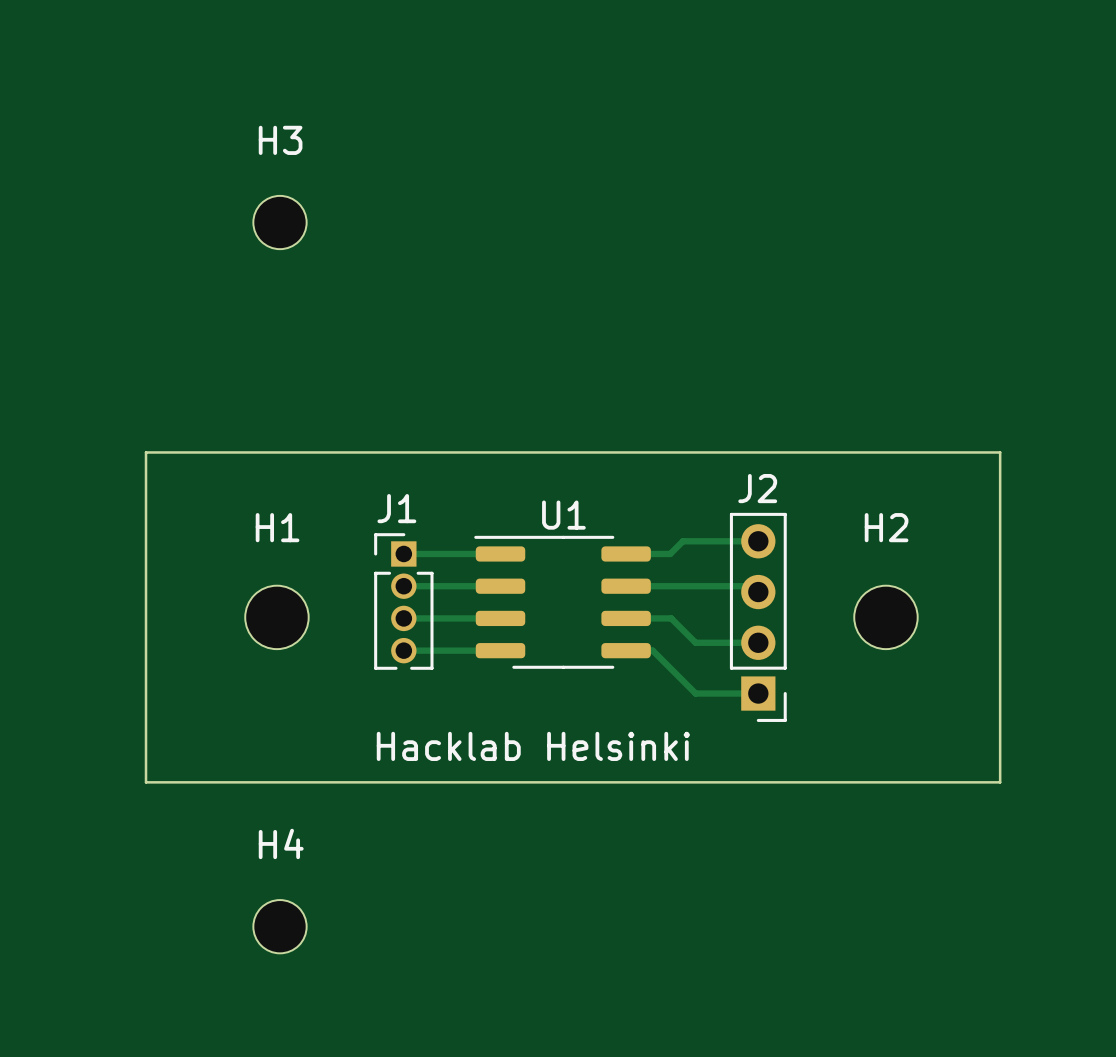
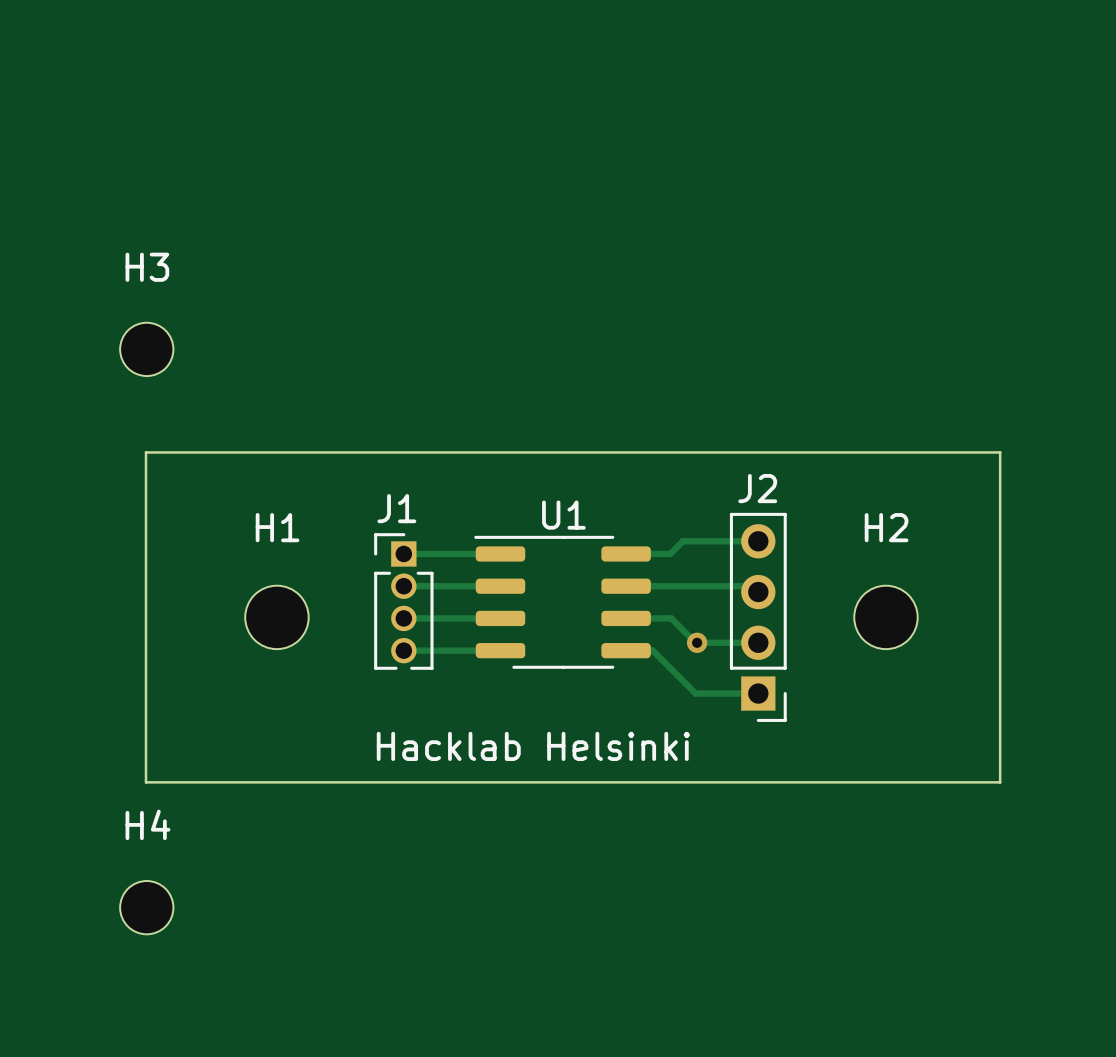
H3 position: (279, 222) -> (146, 349)
via: none -> (697, 642)
H4 position: (279, 926) -> (146, 907)

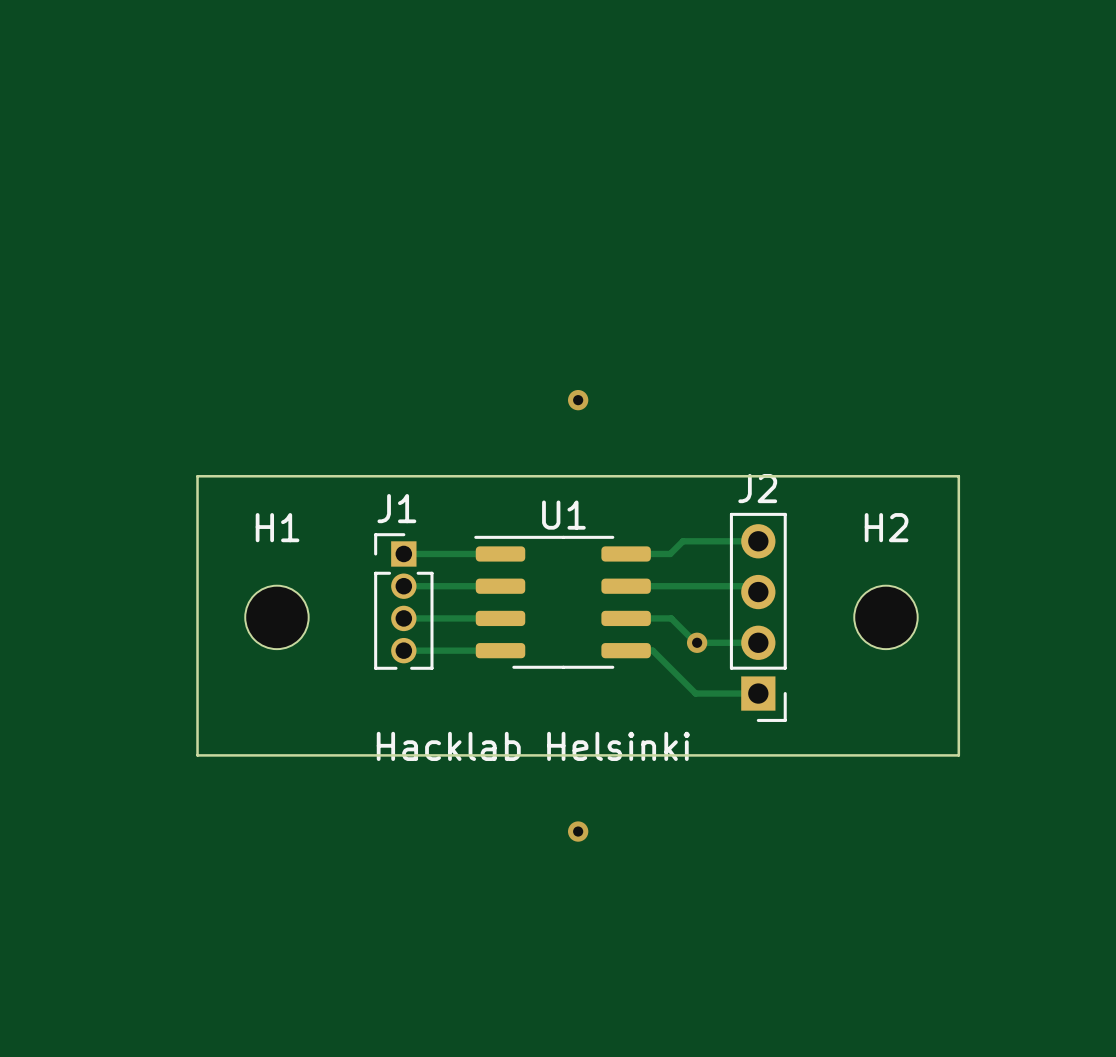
H3: (146, 349) -> none
via: none -> (578, 400)
board edge: (146, 452) (1000, 452) (1000, 782) (146, 782) (146, 452) -> (197, 476) (197, 755) (958, 755) (958, 476) (197, 476)
via: none -> (578, 831)
H4: (146, 907) -> none

